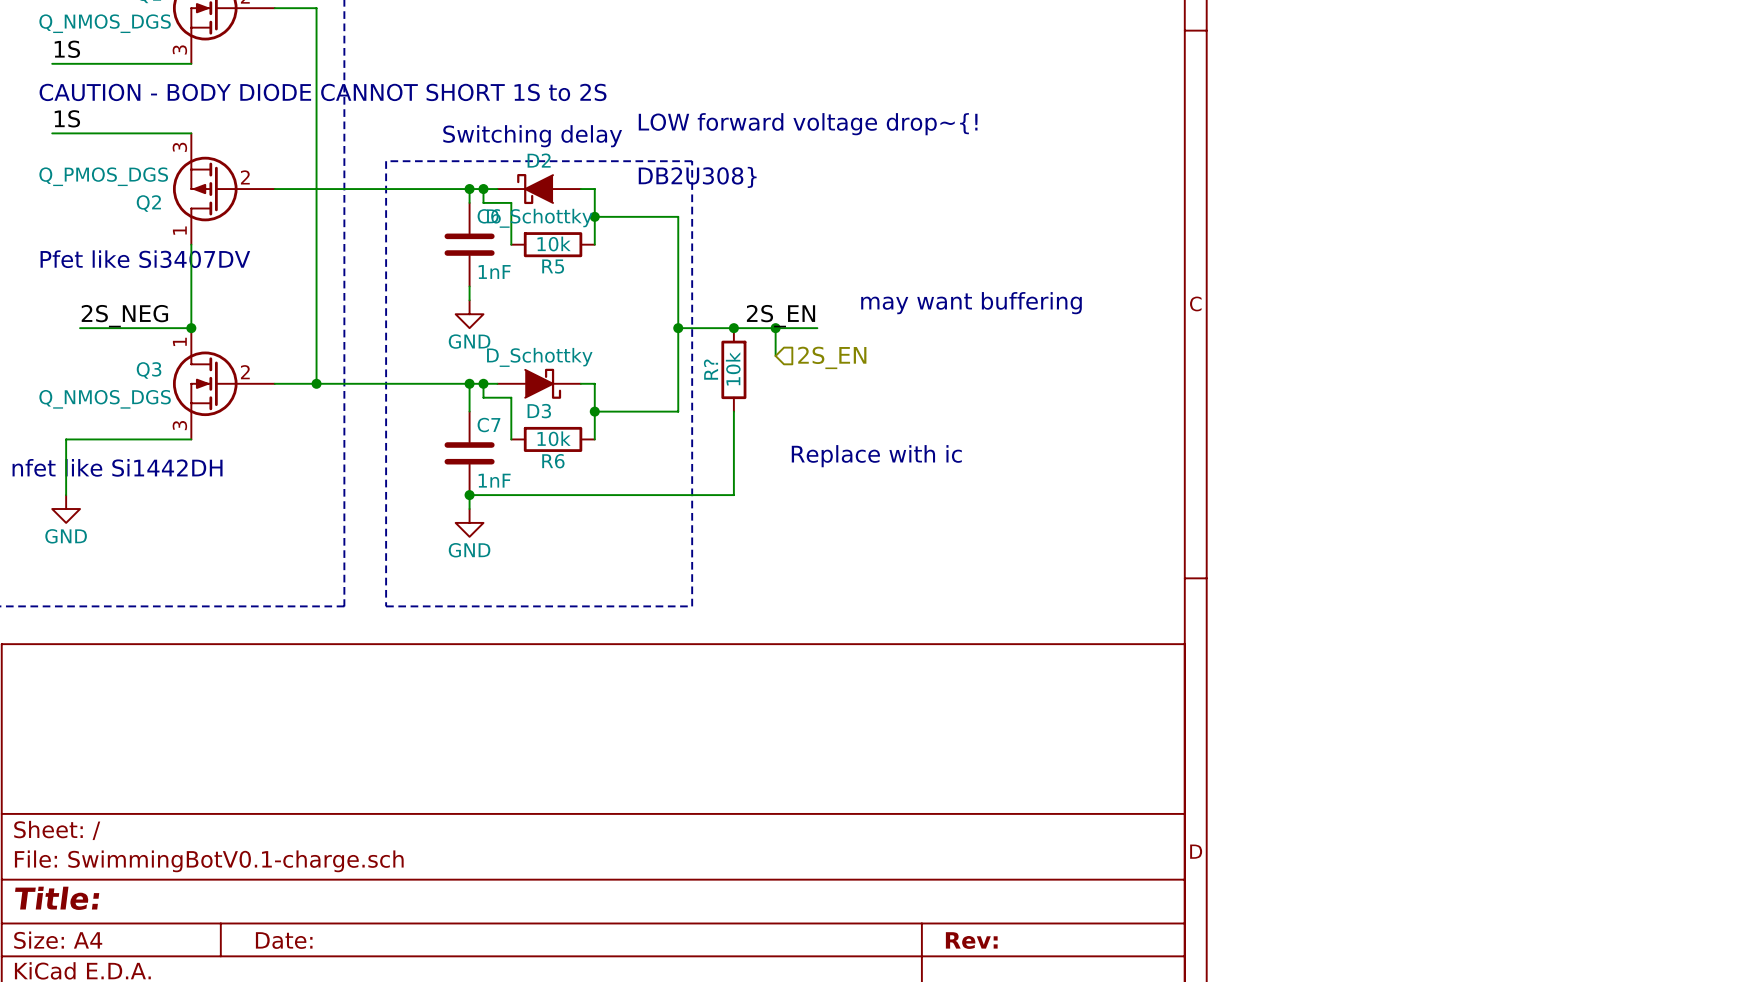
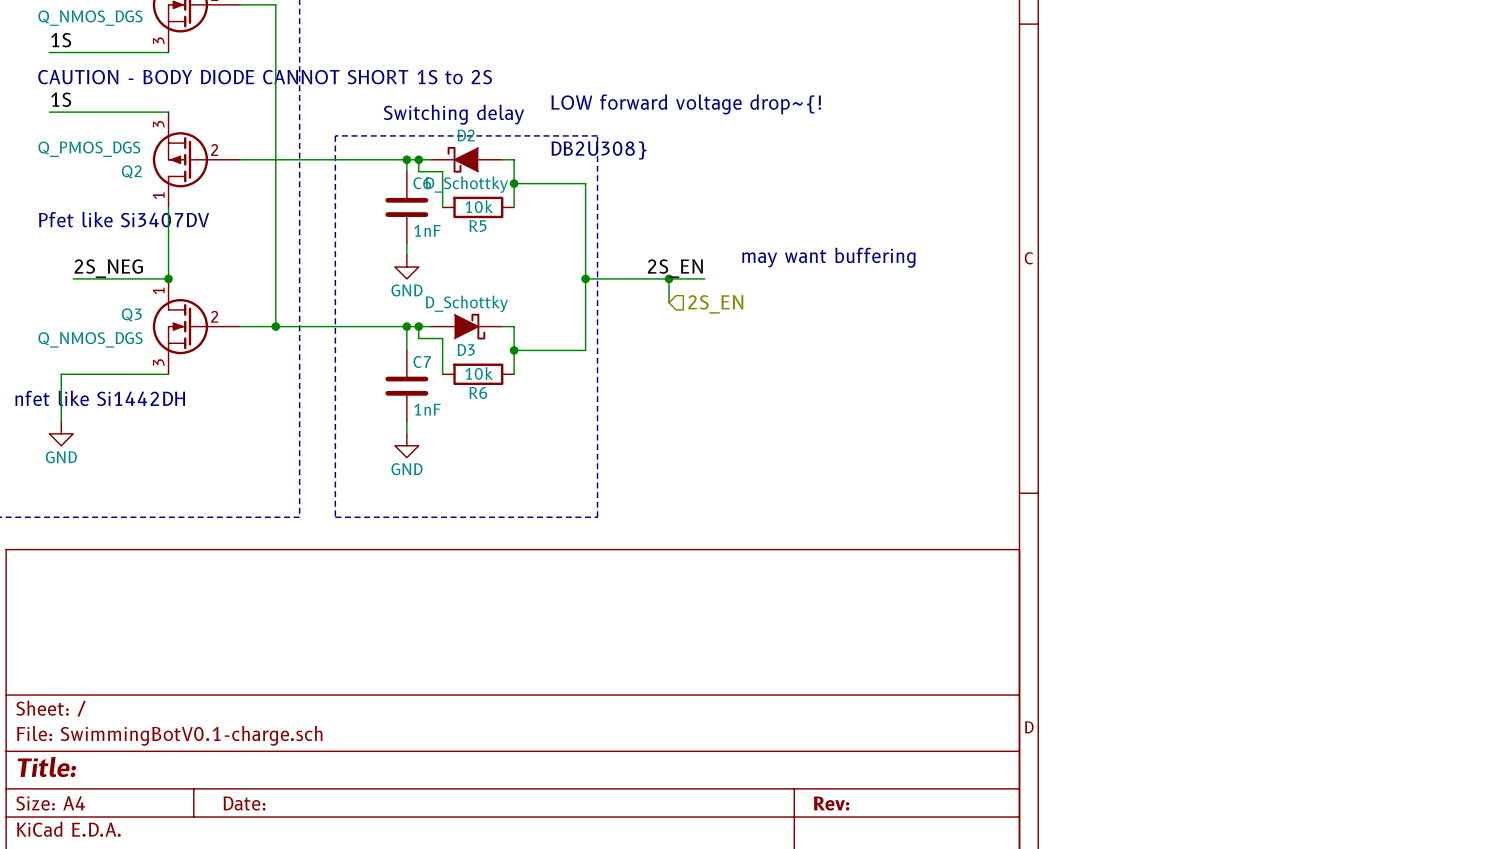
junction: (733, 328) -> none
R?: 10k (733, 369) -> none
wire: (733, 411) (733, 495) (469, 495) -> none
text: Replace with ic (876, 456) -> none
junction: (469, 495) -> none

